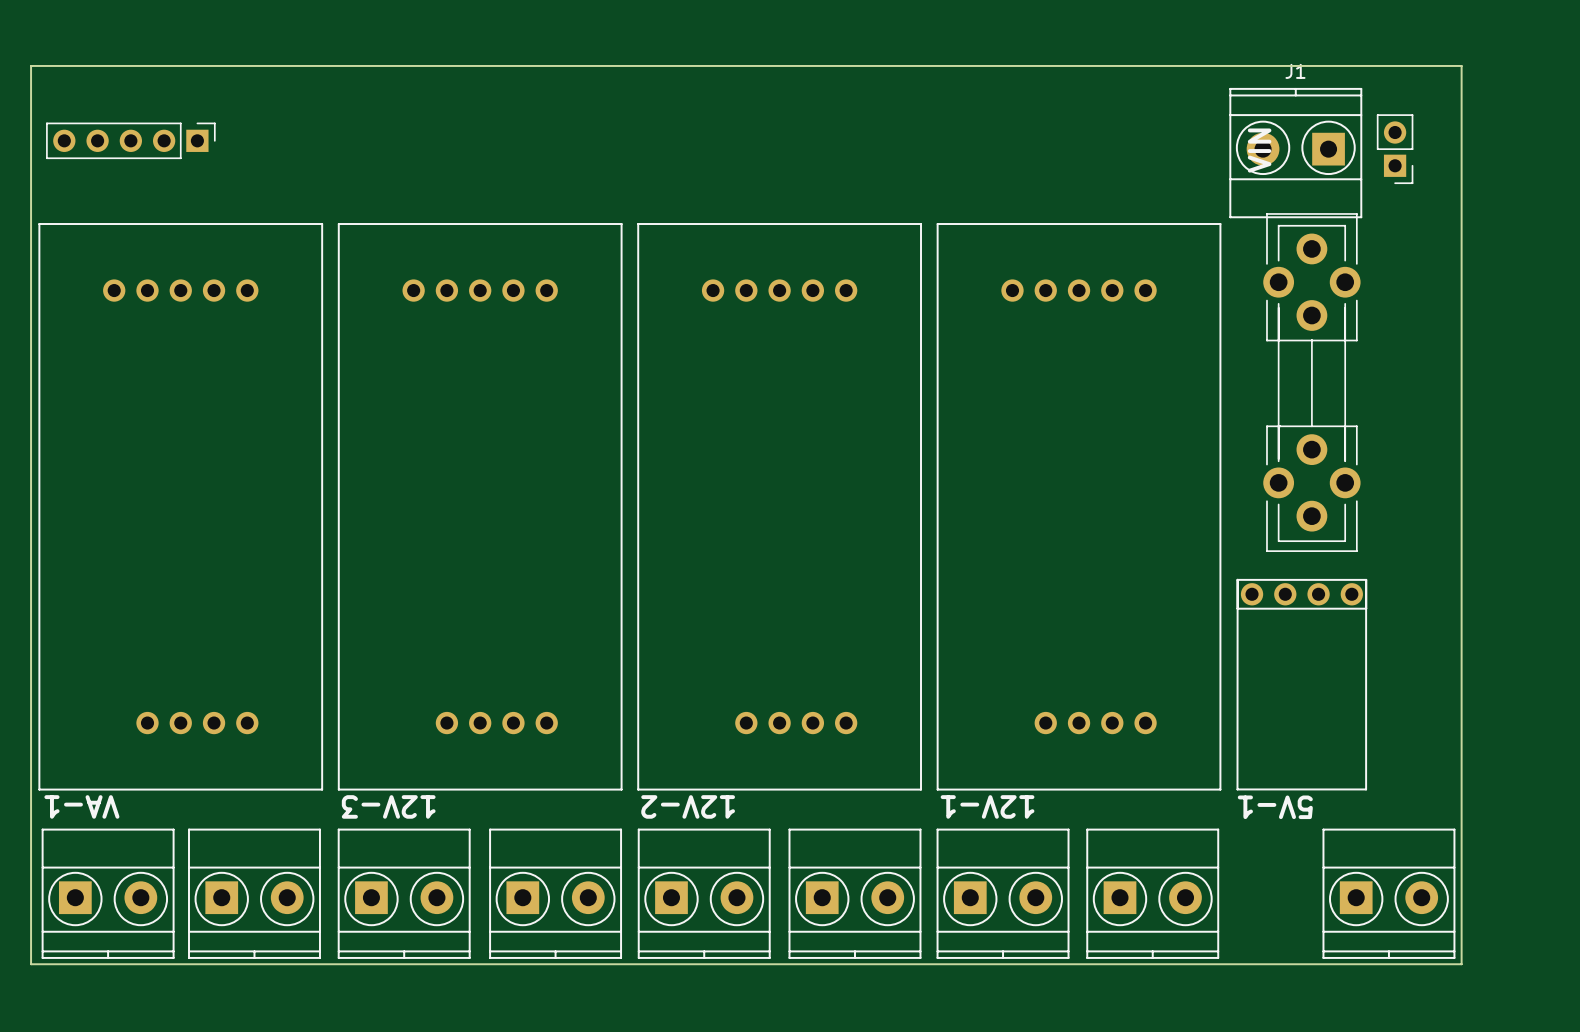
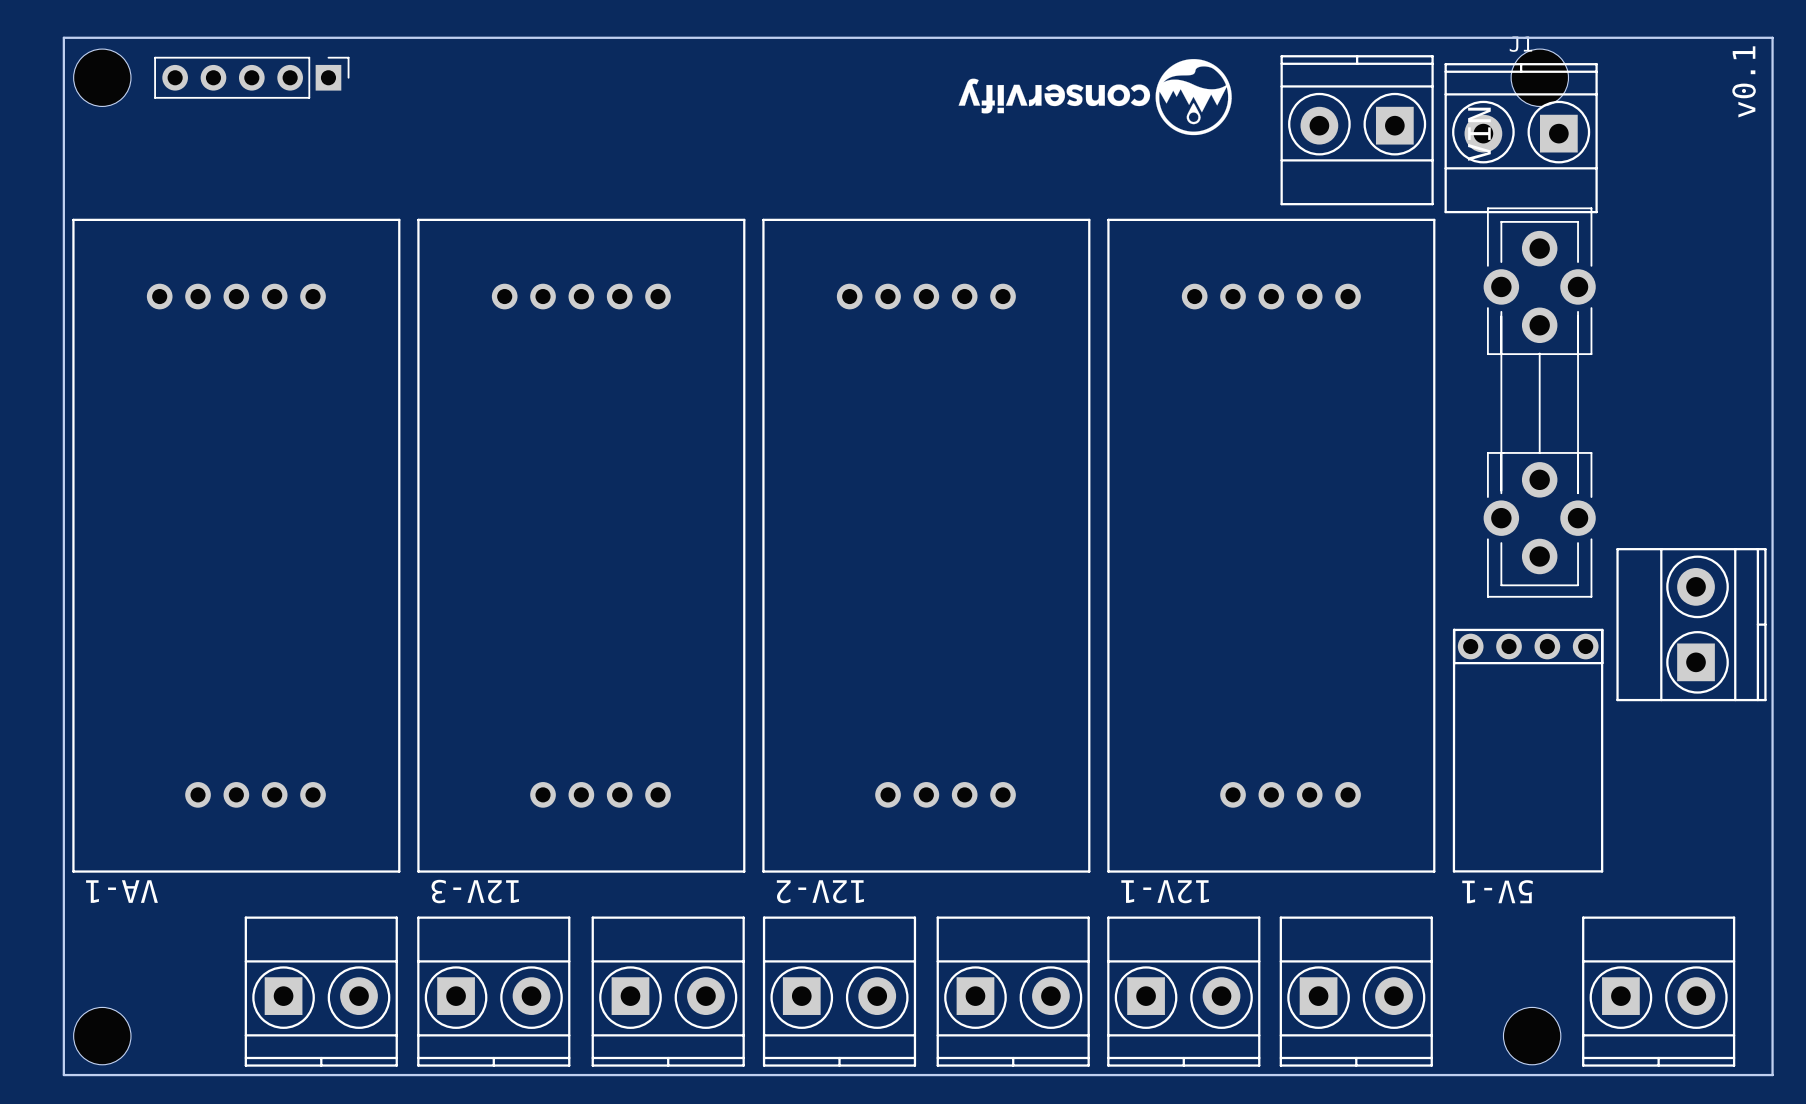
board edge: (1461, 65) (1461, 964) (31, 964) -> (1712, 37) (1772, 37) (1772, 1075) (63, 1075) (63, 1072)
drawing: none -> [958, 59, 1232, 136]
part: none -> (102, 77)
part: none -> (1539, 77)
text: none -> v0.1 (1744, 81)
part position: (130, 140) -> (251, 77)
part: none -> (1357, 130)
part: (1395, 149) -> none
part: none -> (1691, 624)
part: (108, 893) -> none
part position: (1388, 893) -> (1658, 991)
part: none -> (102, 1036)
part: none -> (1532, 1036)

